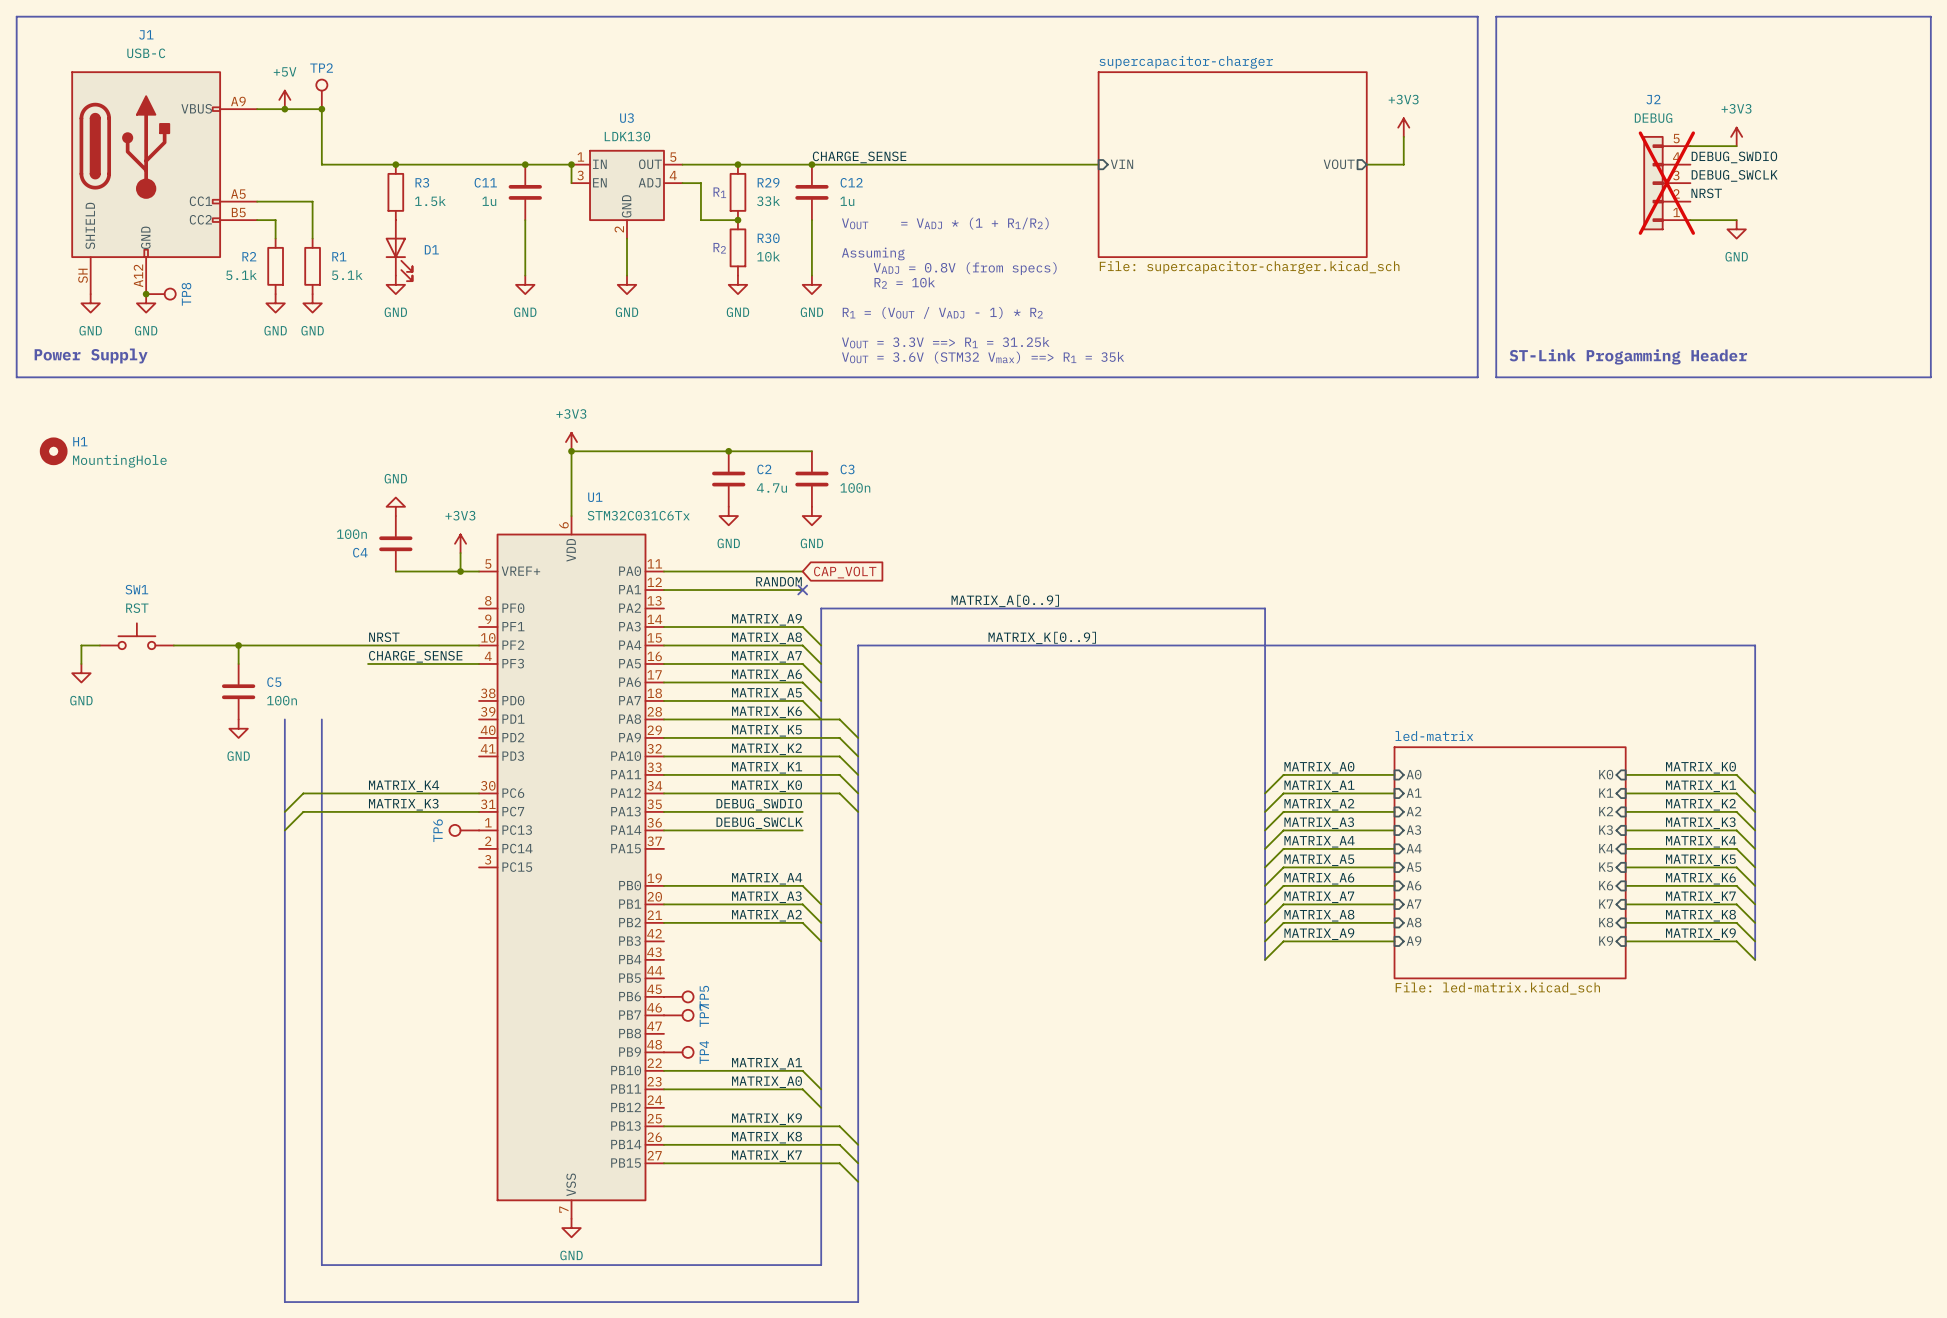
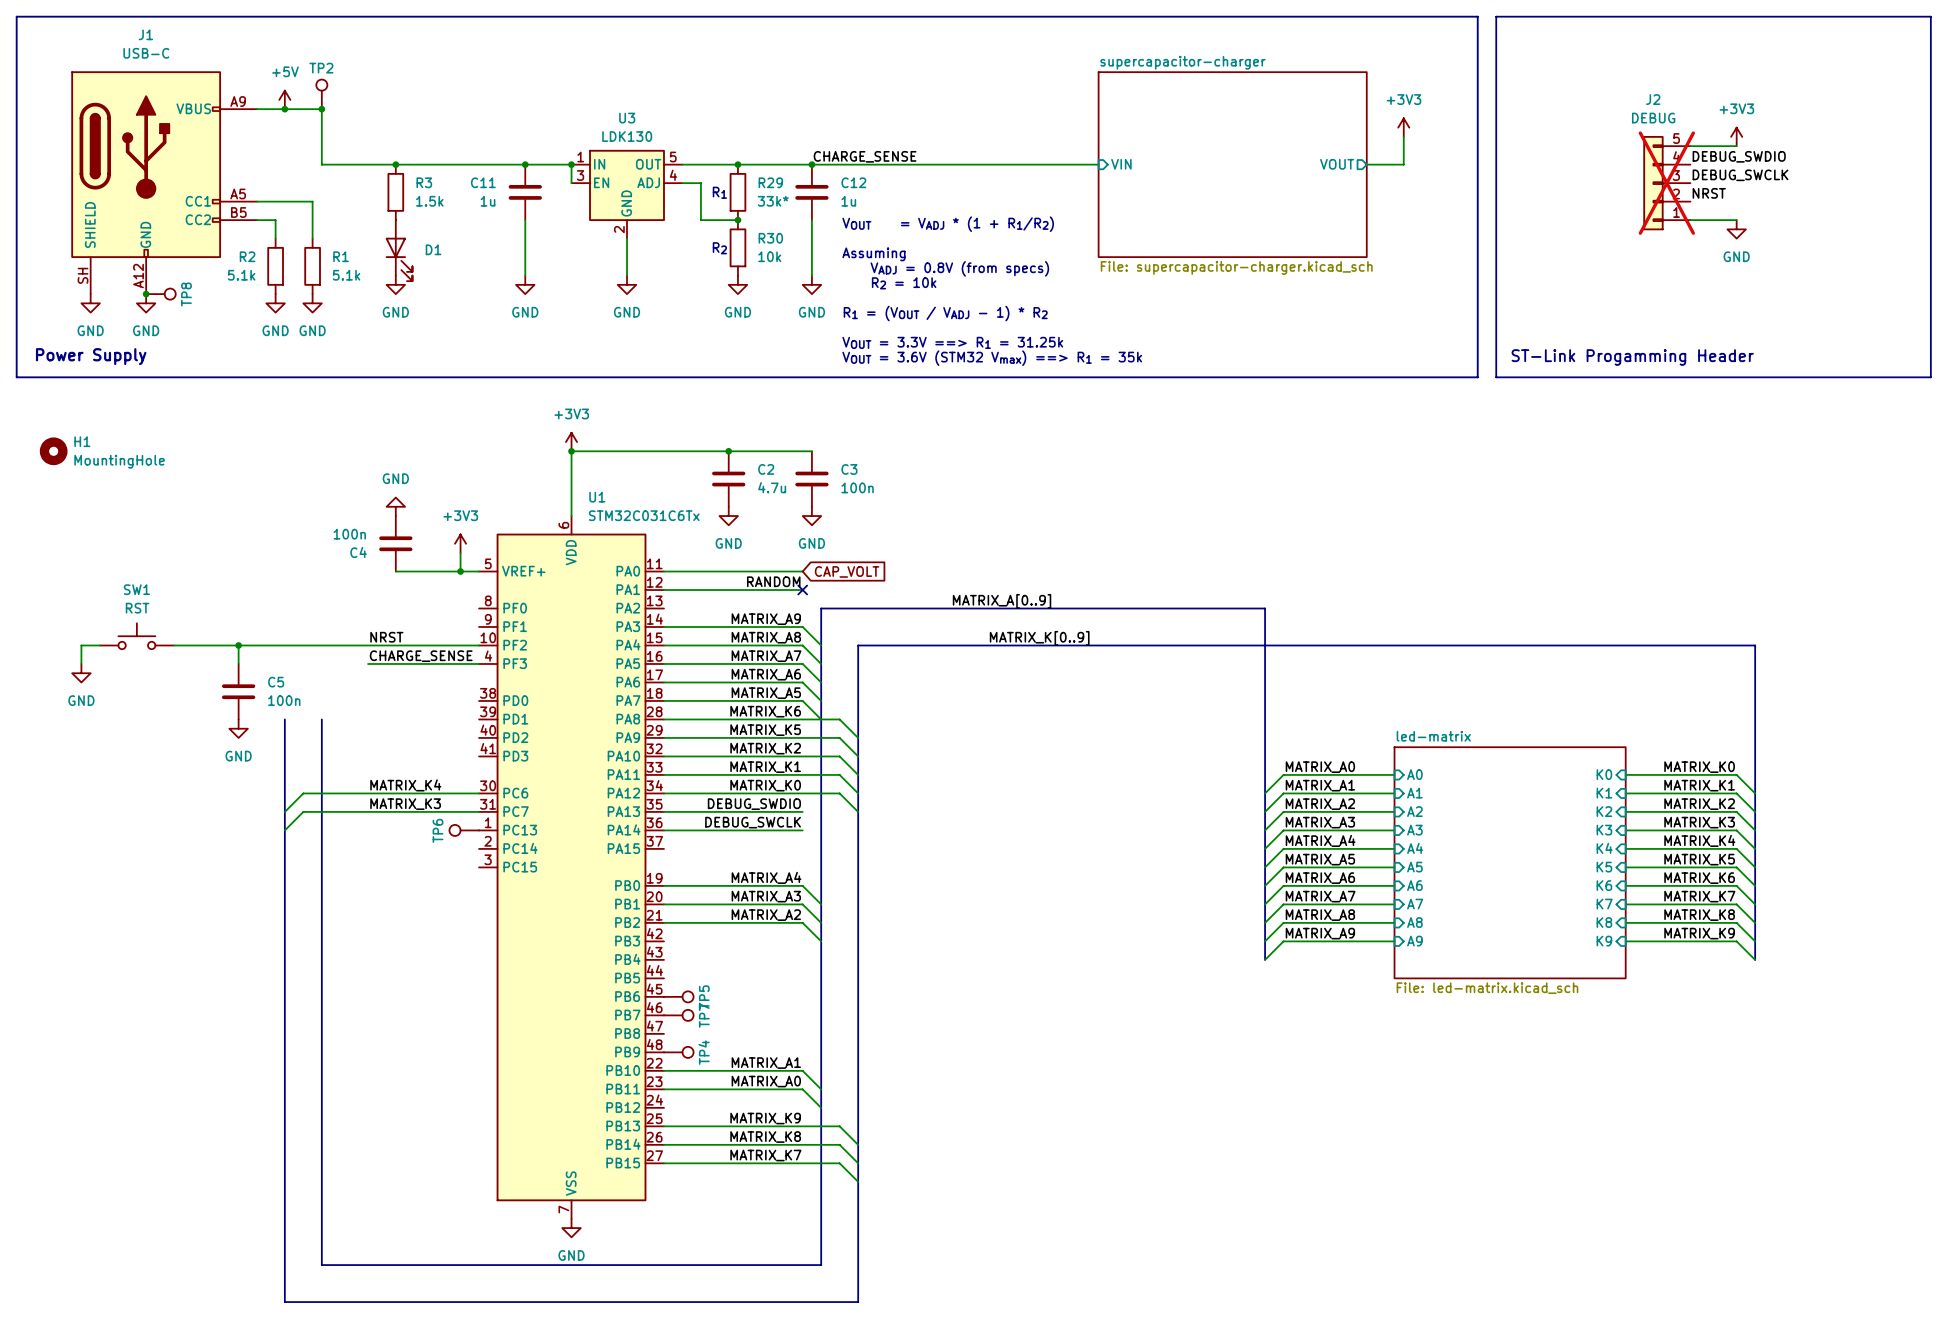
R29 value: 33k (768, 201) -> 33k* (773, 201)

